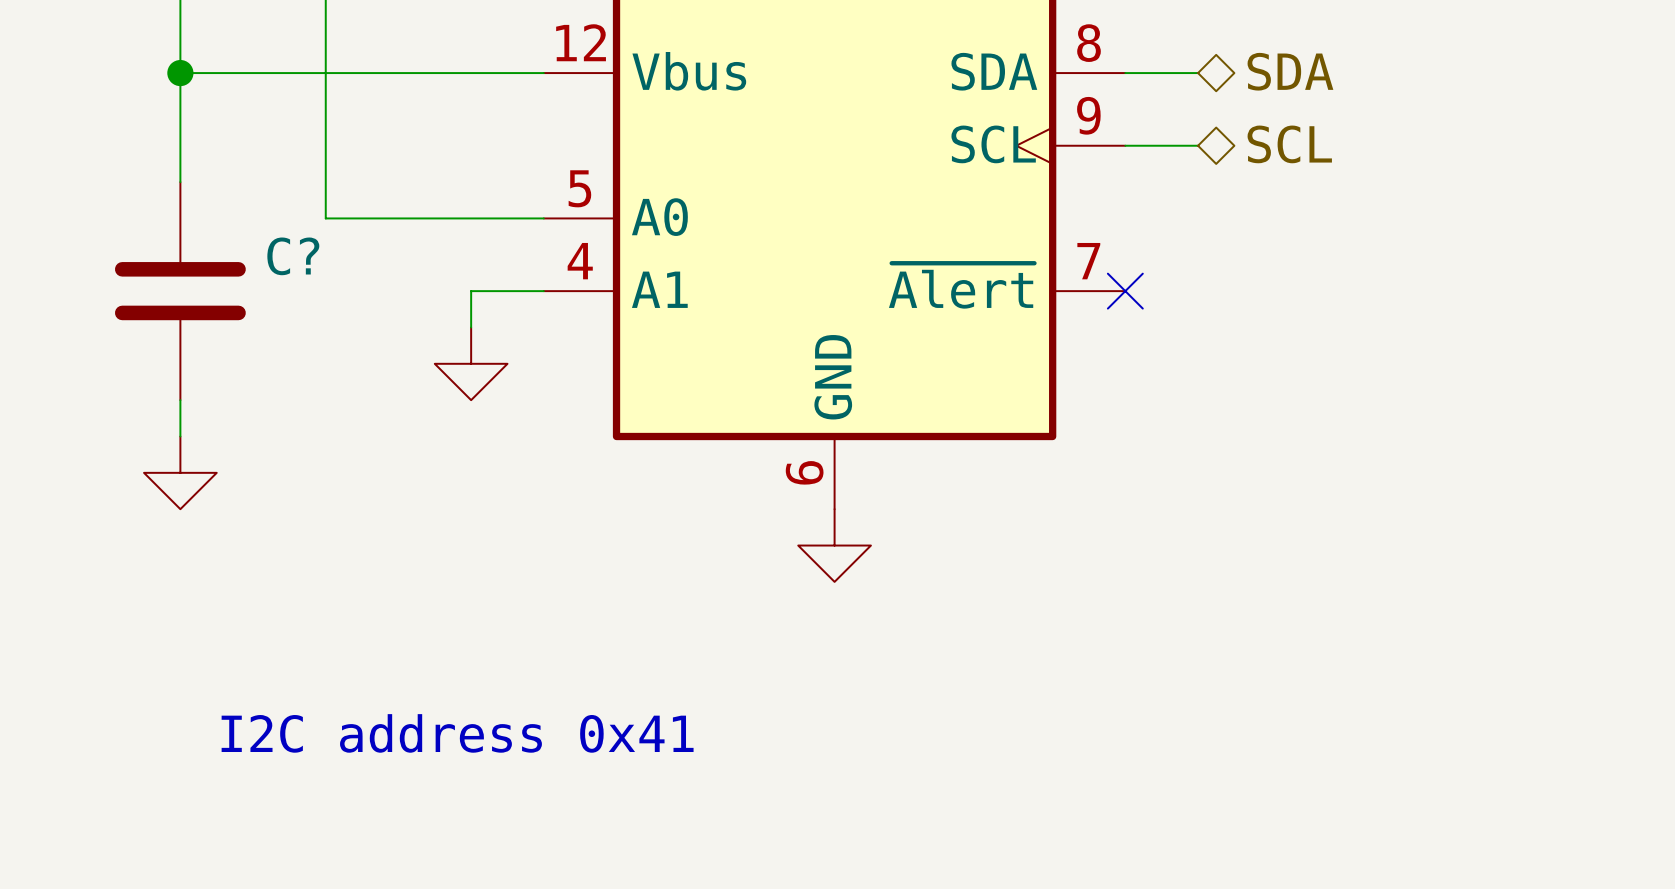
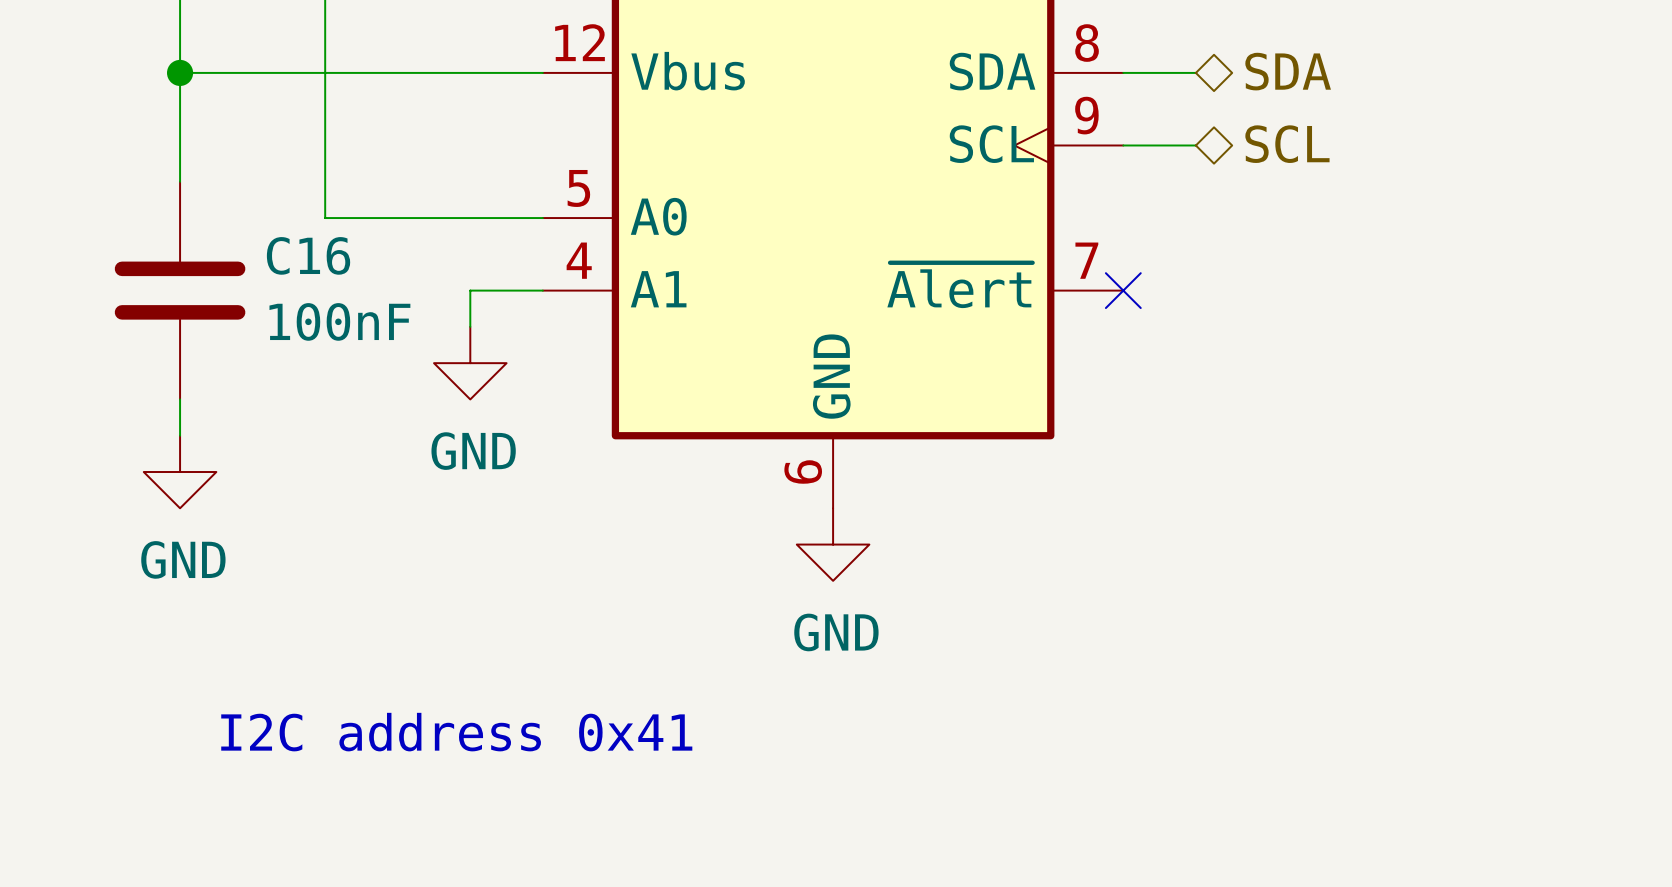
C? name: C? (293, 256) -> C16 (308, 255)
C? value: none -> 100nF (339, 321)
power symbol text: none -> GND (473, 451)
power symbol text: none -> GND (183, 559)
power symbol text: none -> GND (836, 632)

